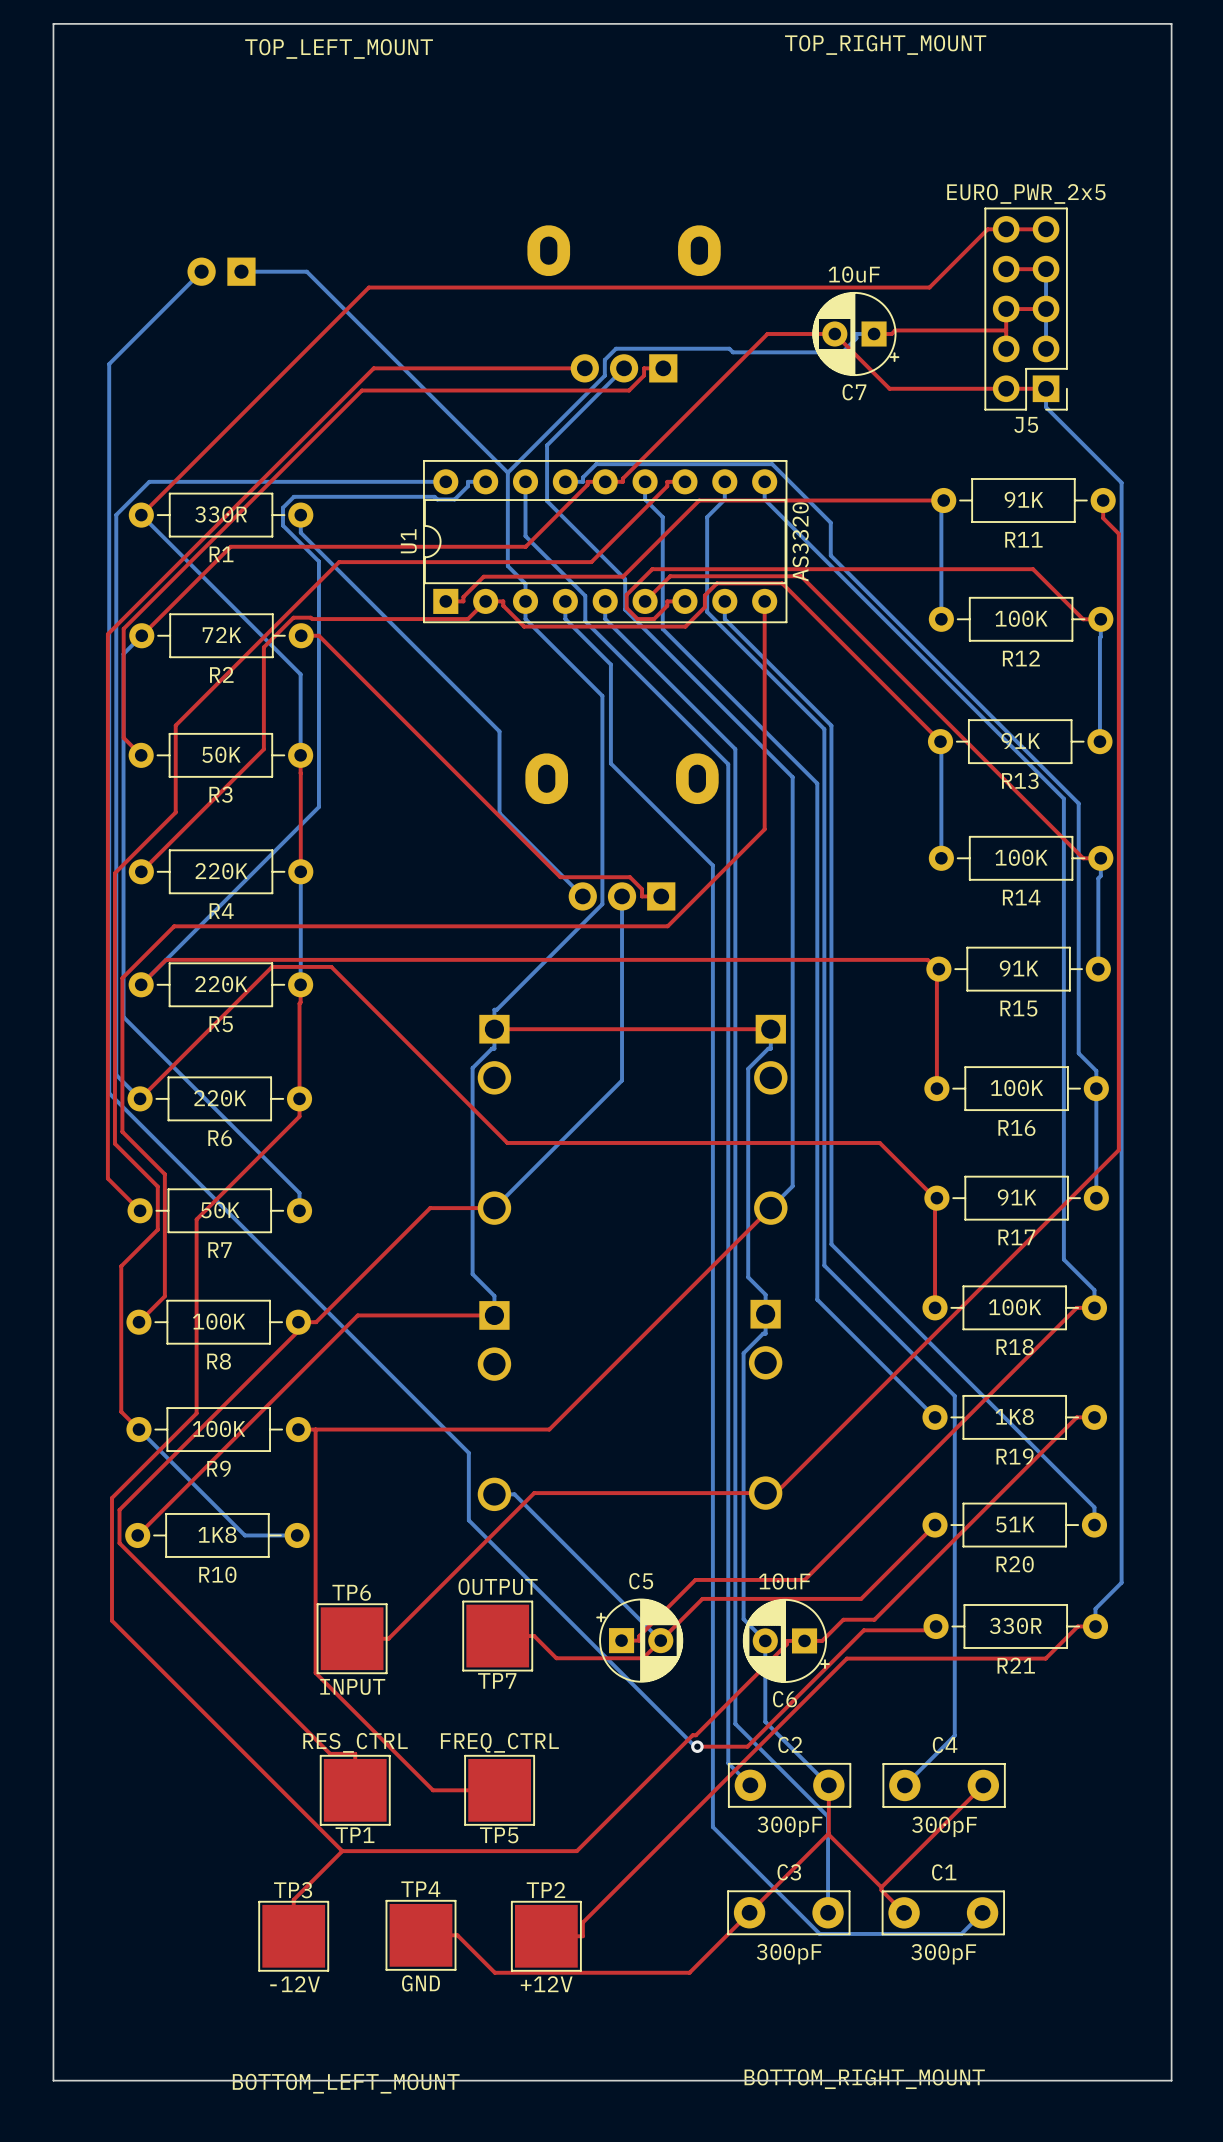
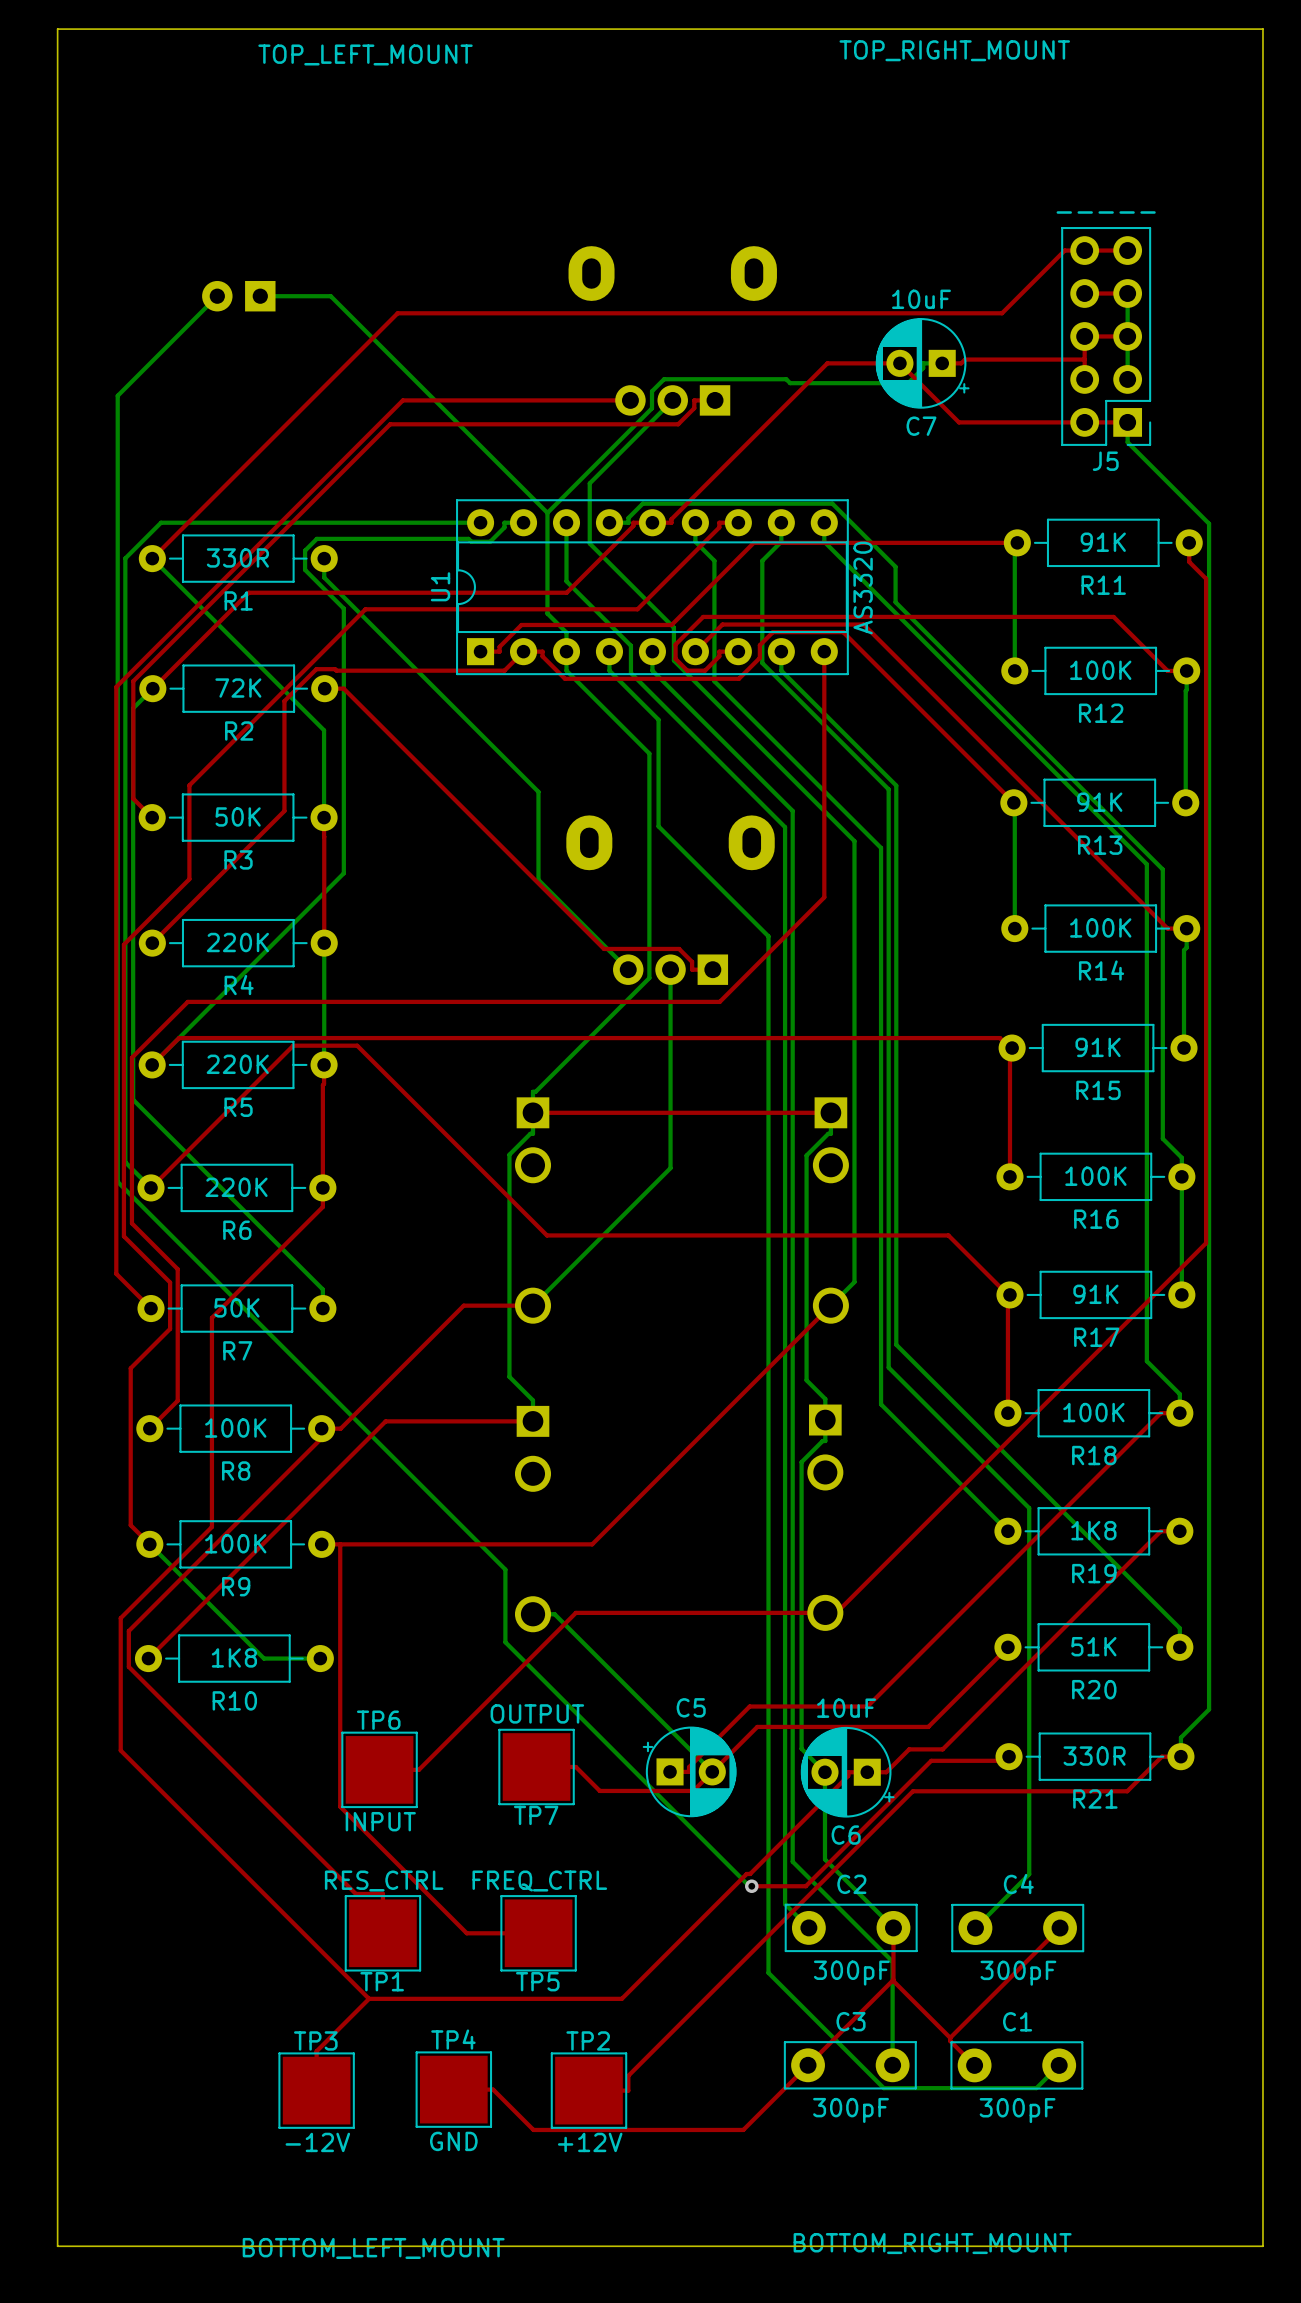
J5 value: EURO_PWR_2x5 (1026, 193) -> ----- (1106, 212)

